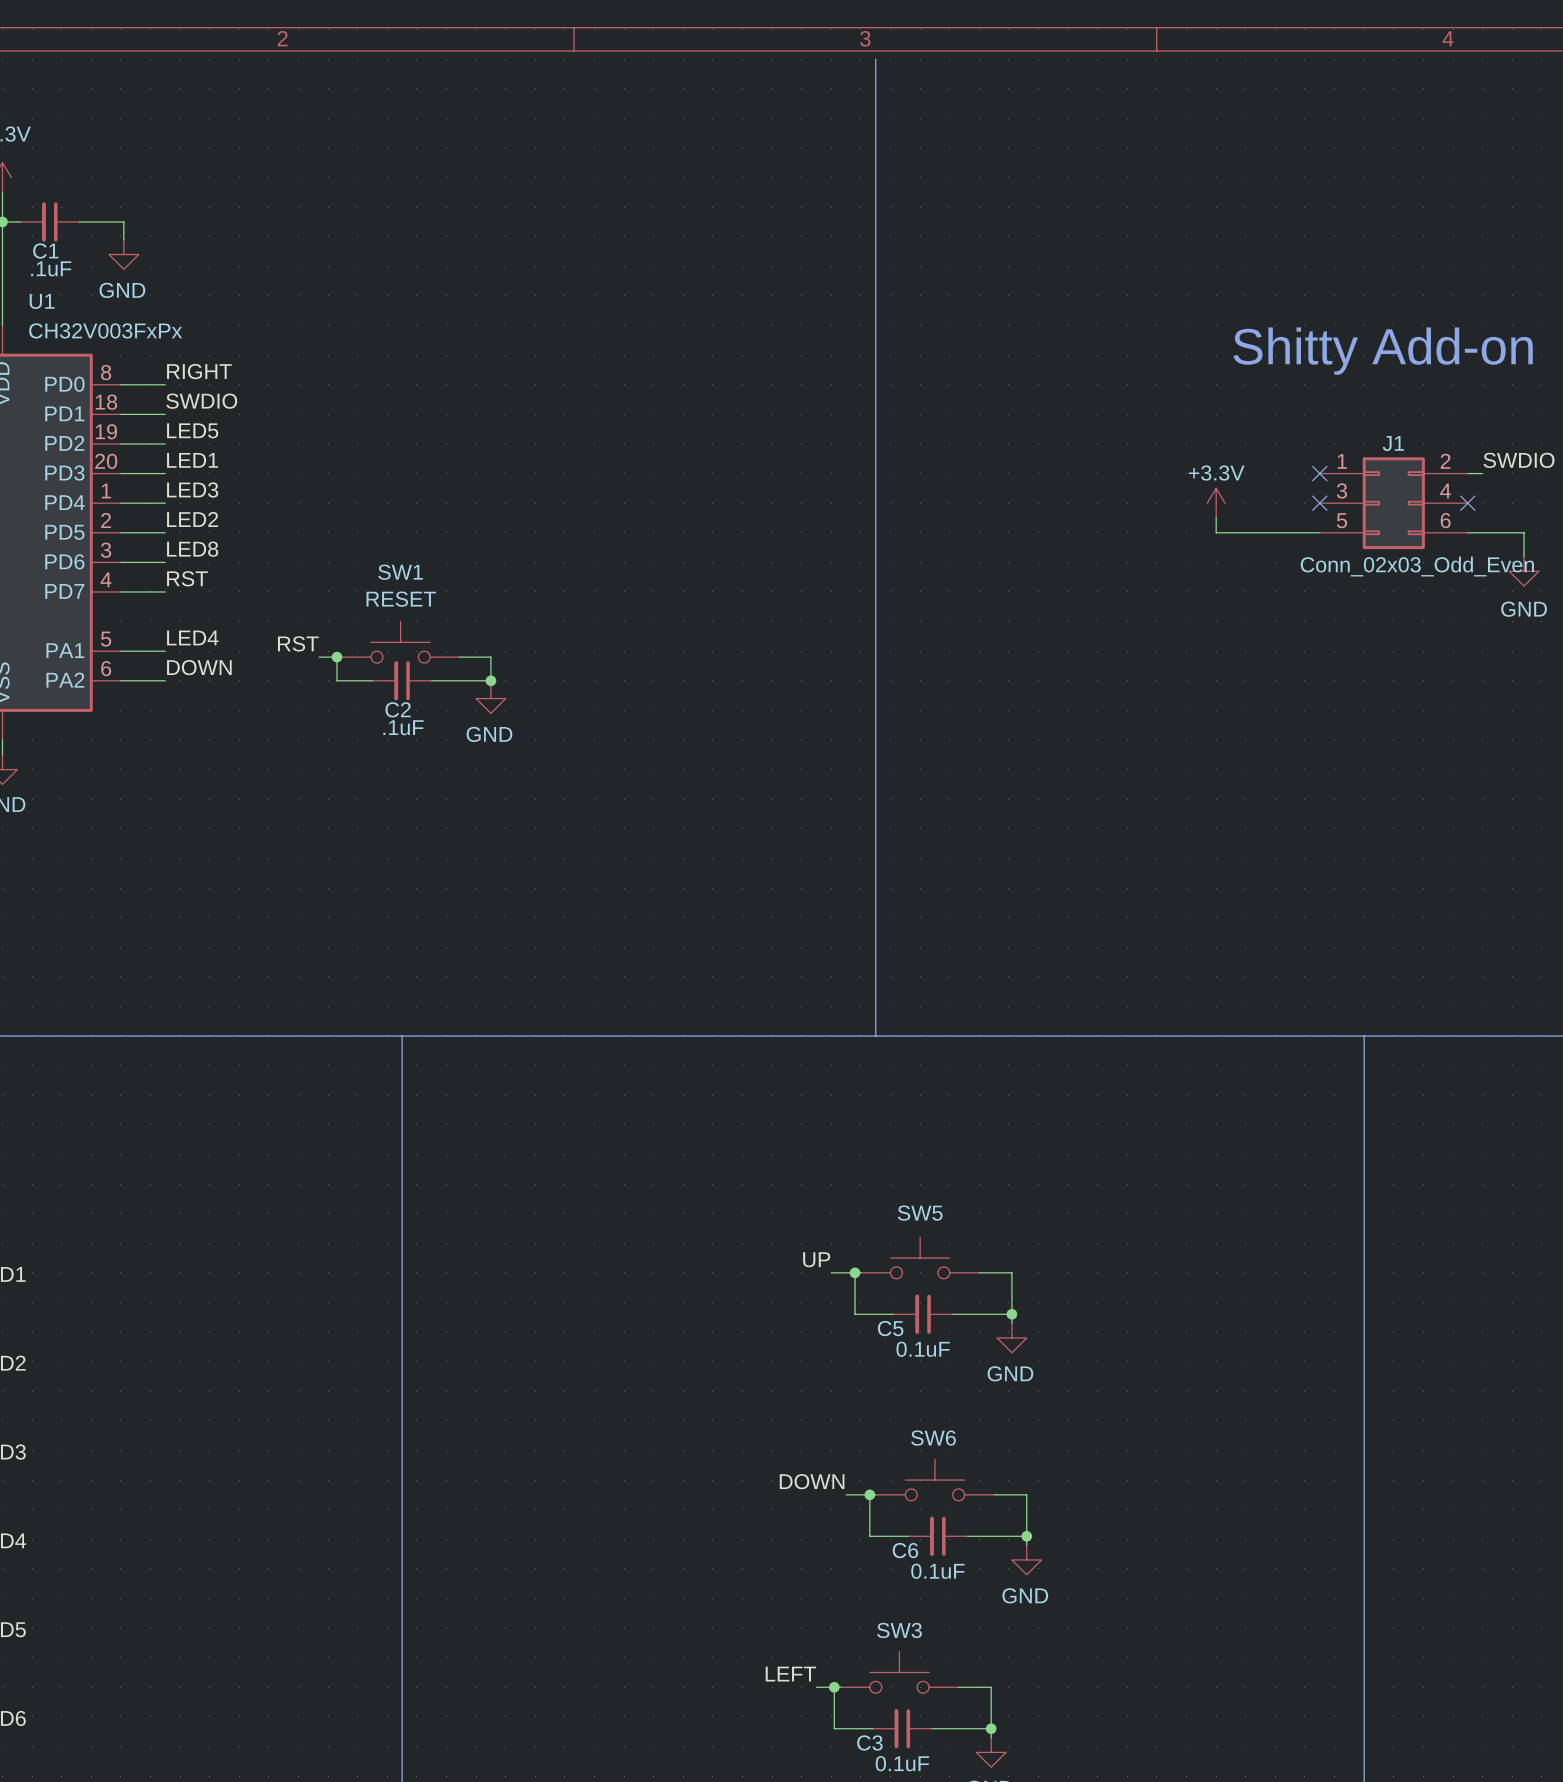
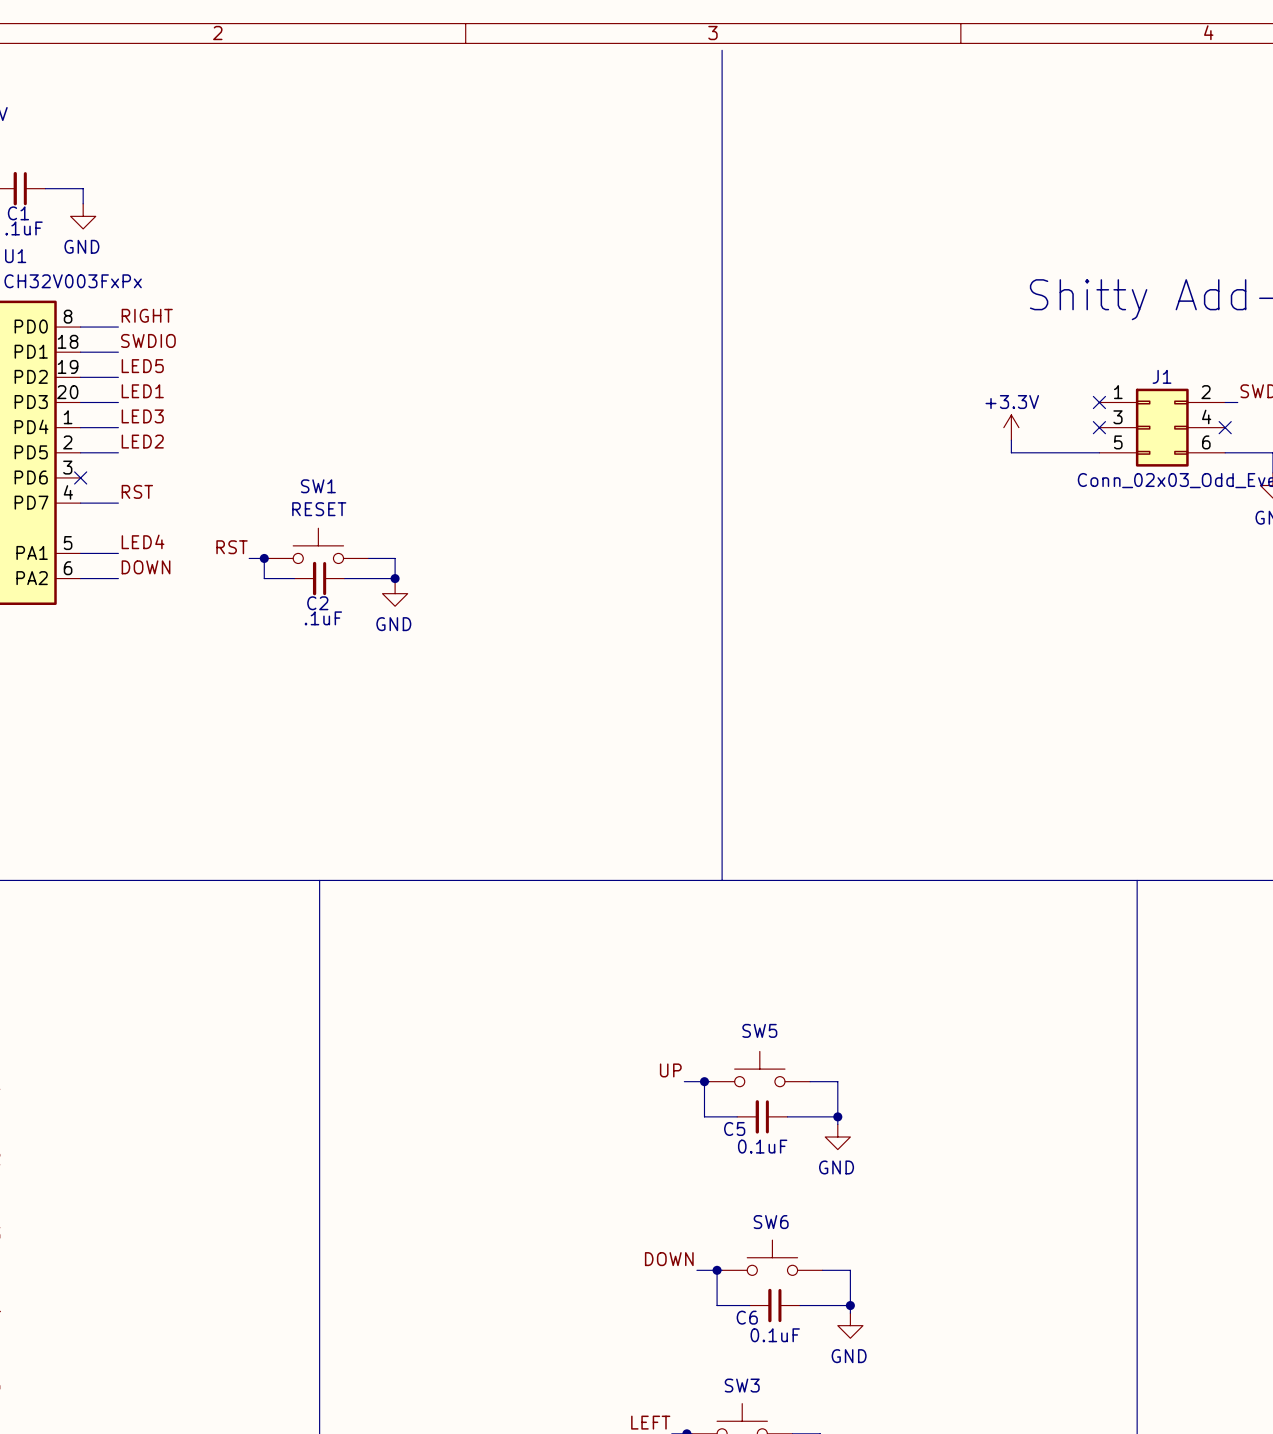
label: LED8 (192, 549) -> none
wire: (120, 562) (165, 562) -> none
no-connect mark: none -> (80, 477)

